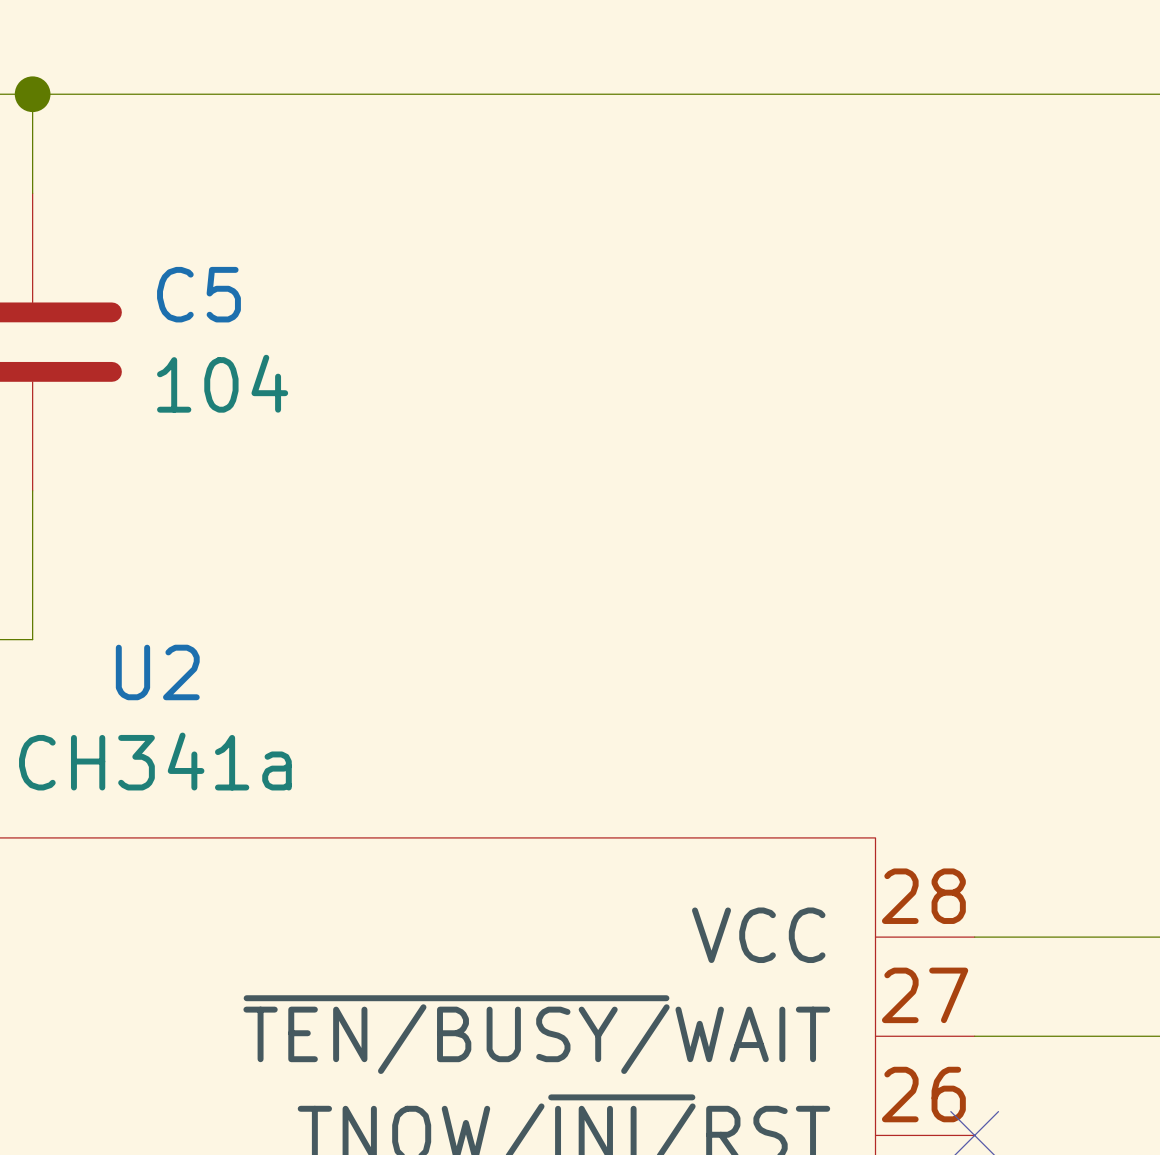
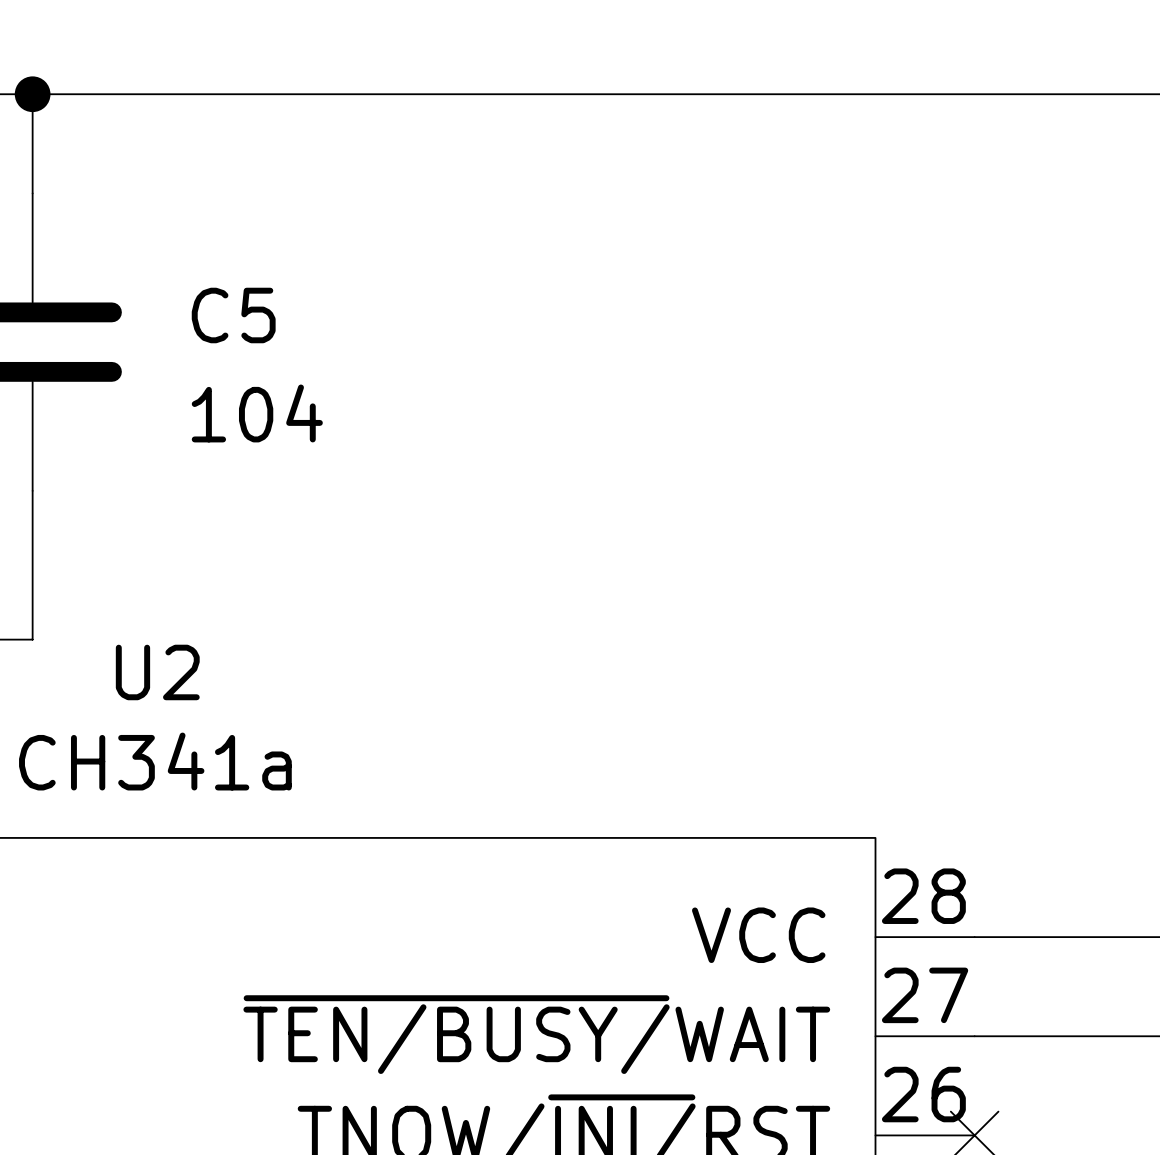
C5 name position: C5 (198, 294) -> C5 (233, 315)
C5 value position: 104 (222, 383) -> 104 (257, 413)

